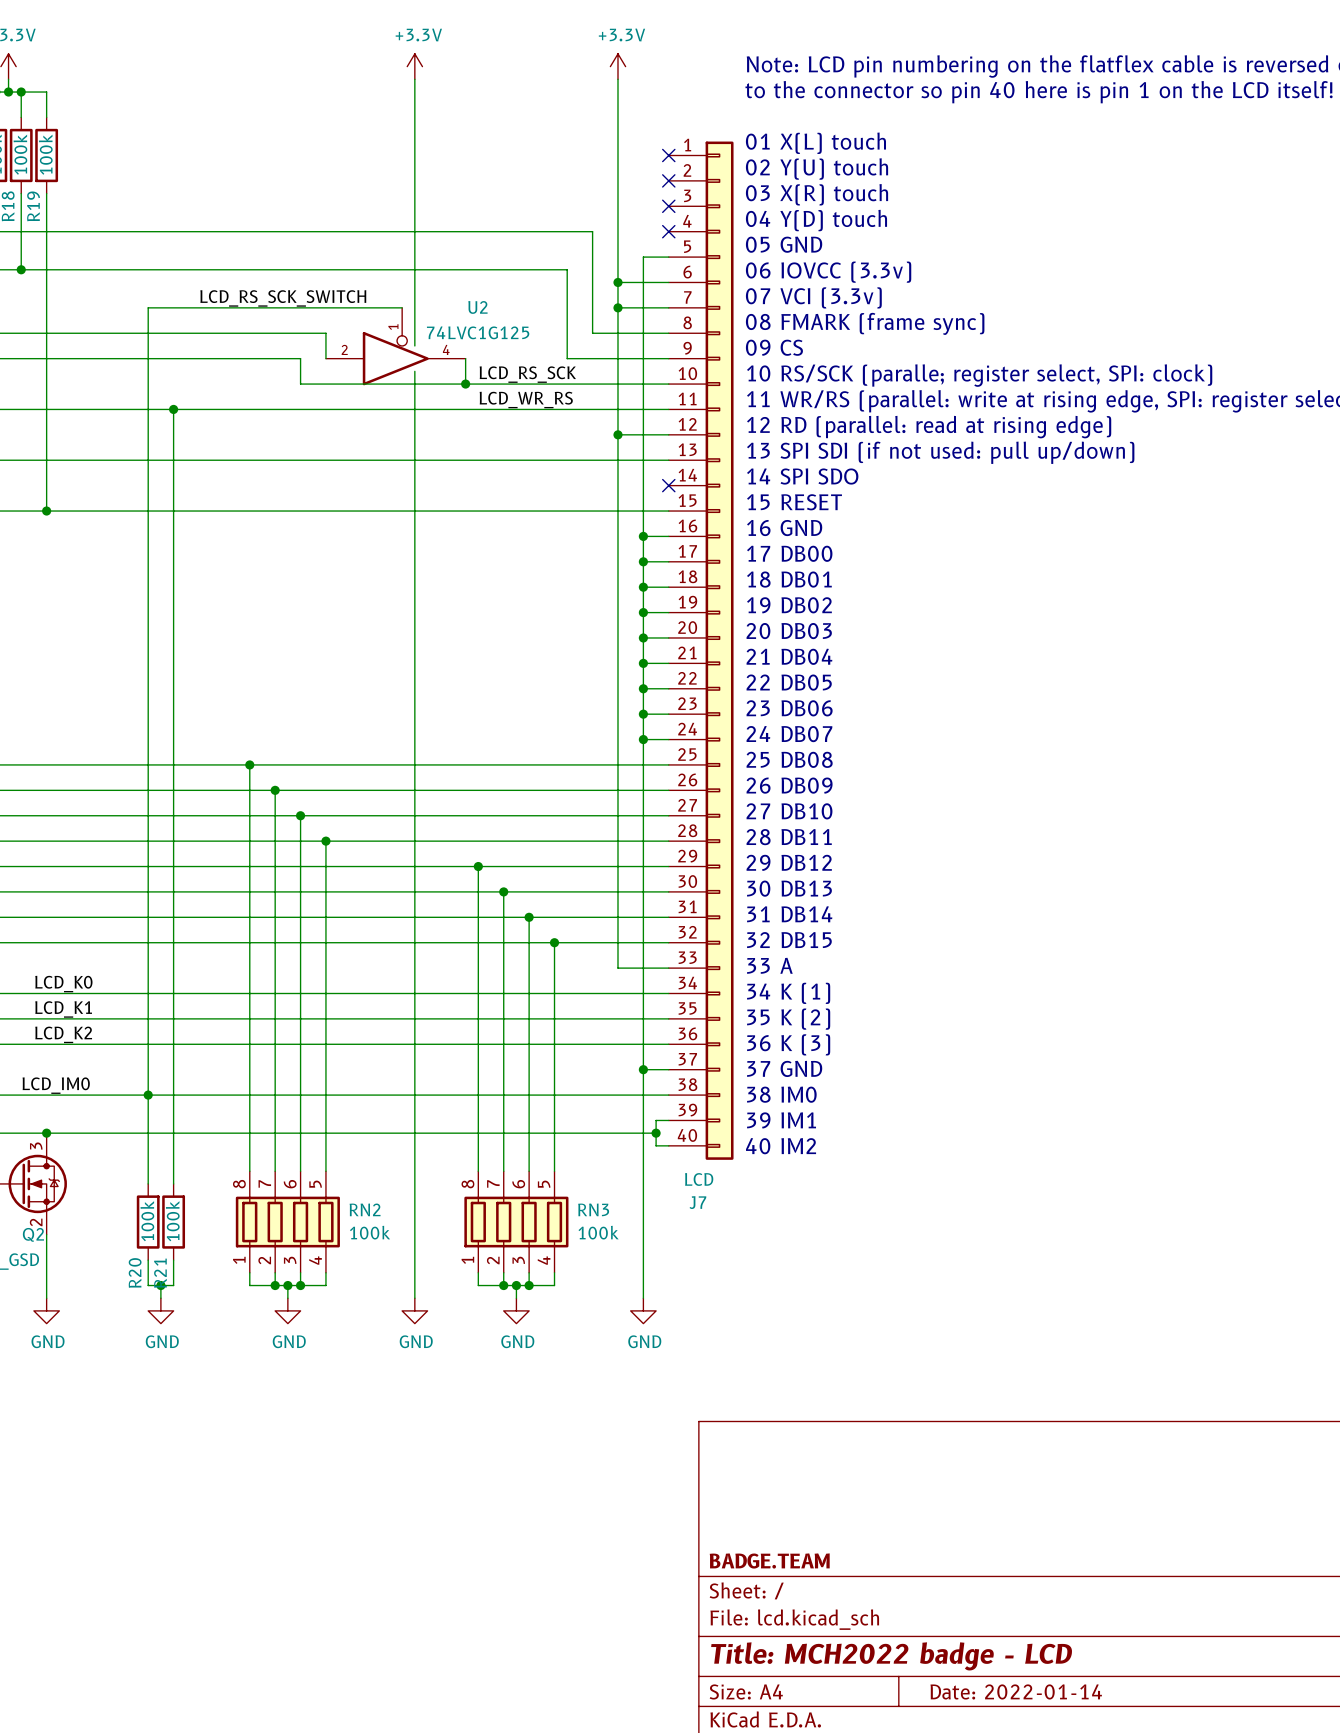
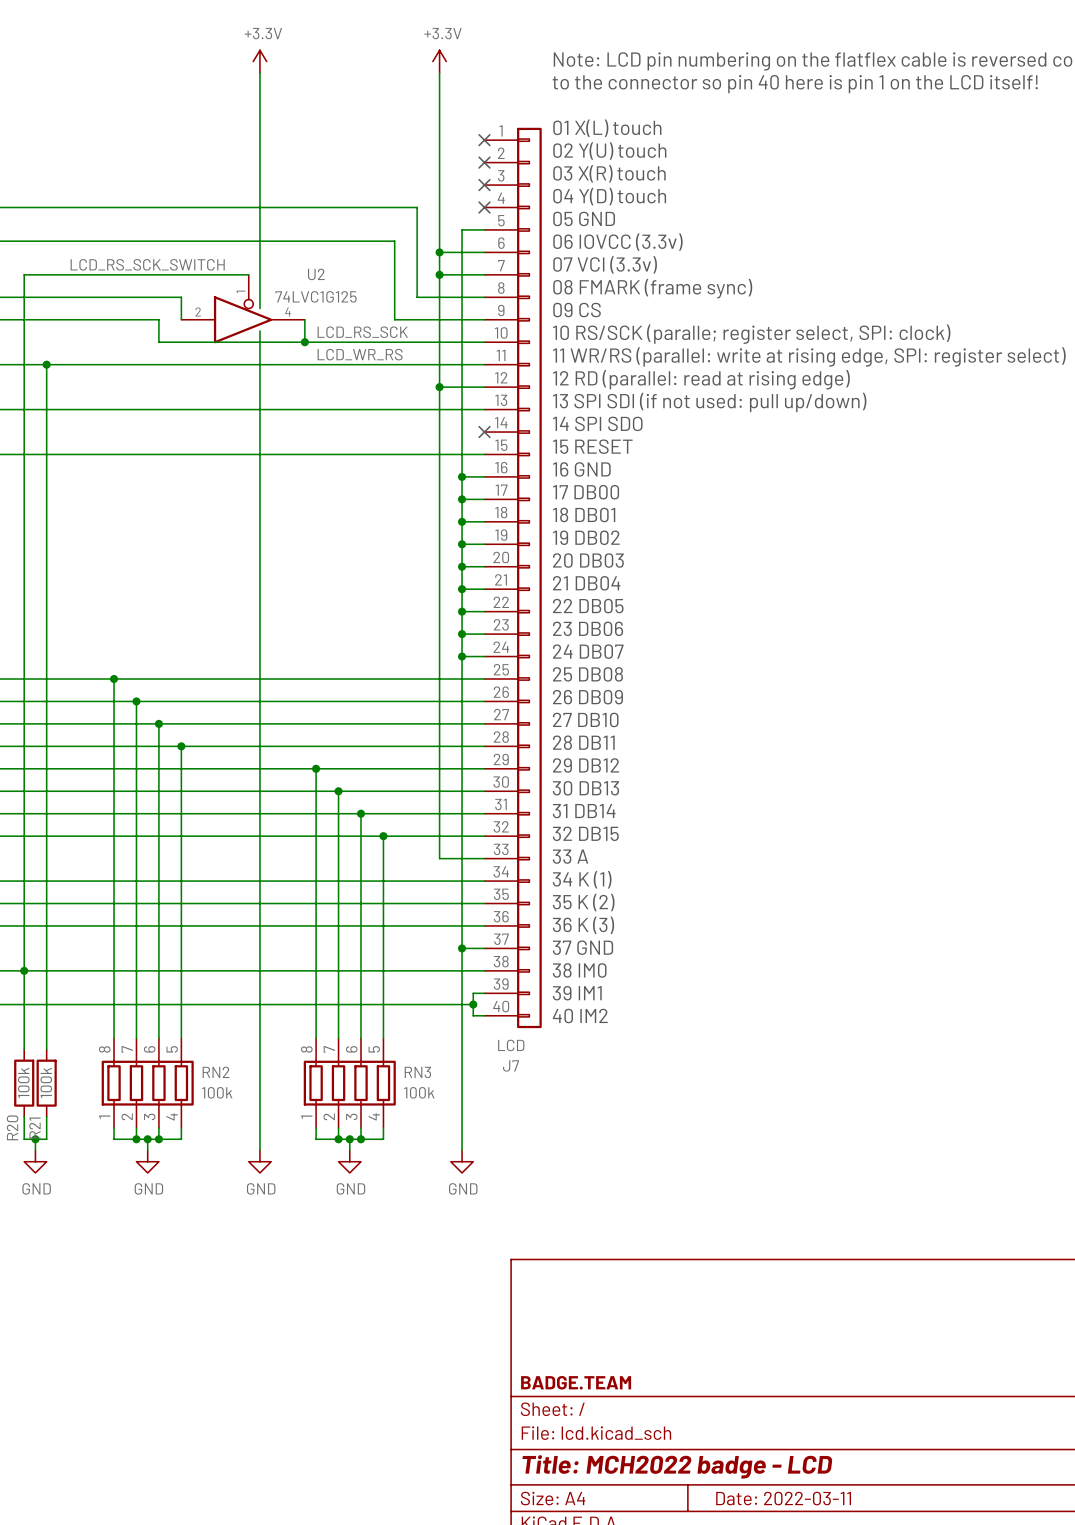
title block: Date: 2022-01-14 (1016, 1691) -> Date: 2022-03-11 (783, 1498)

